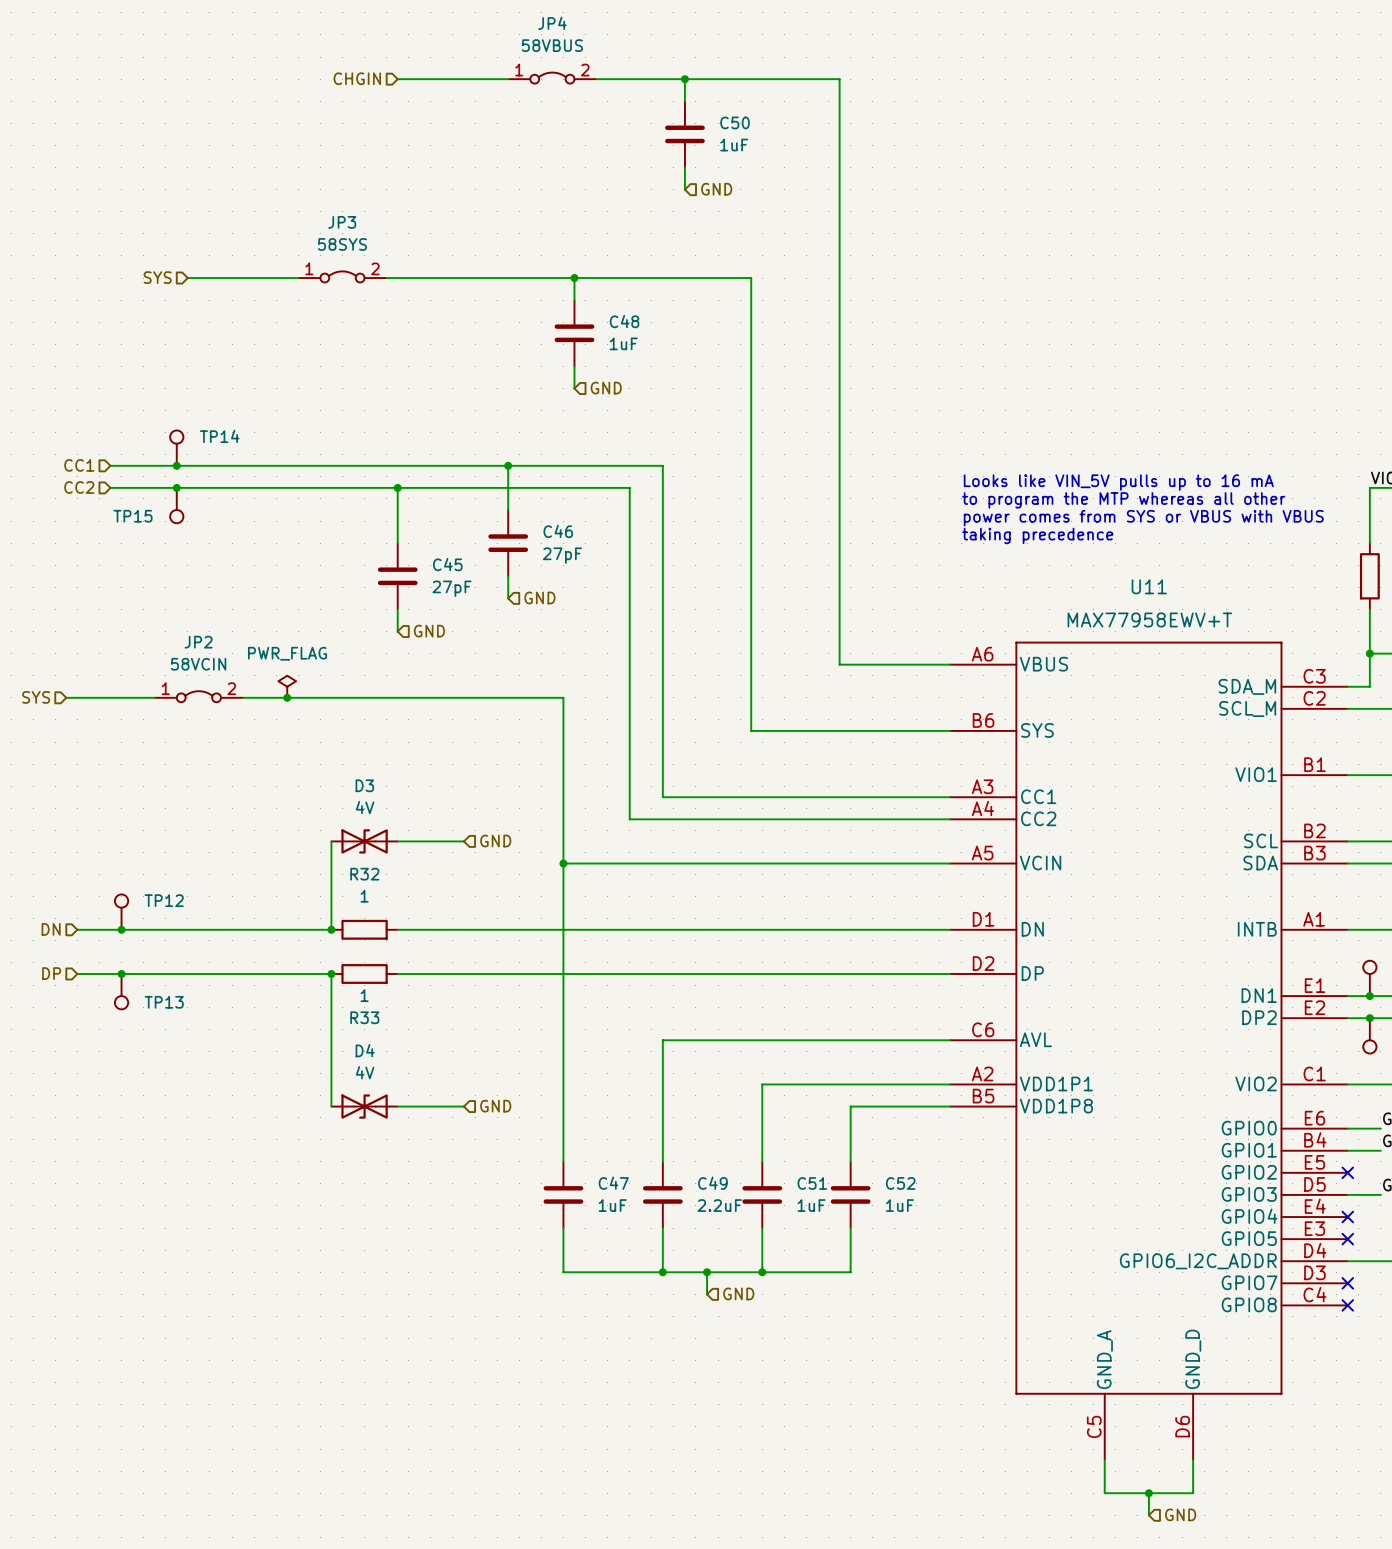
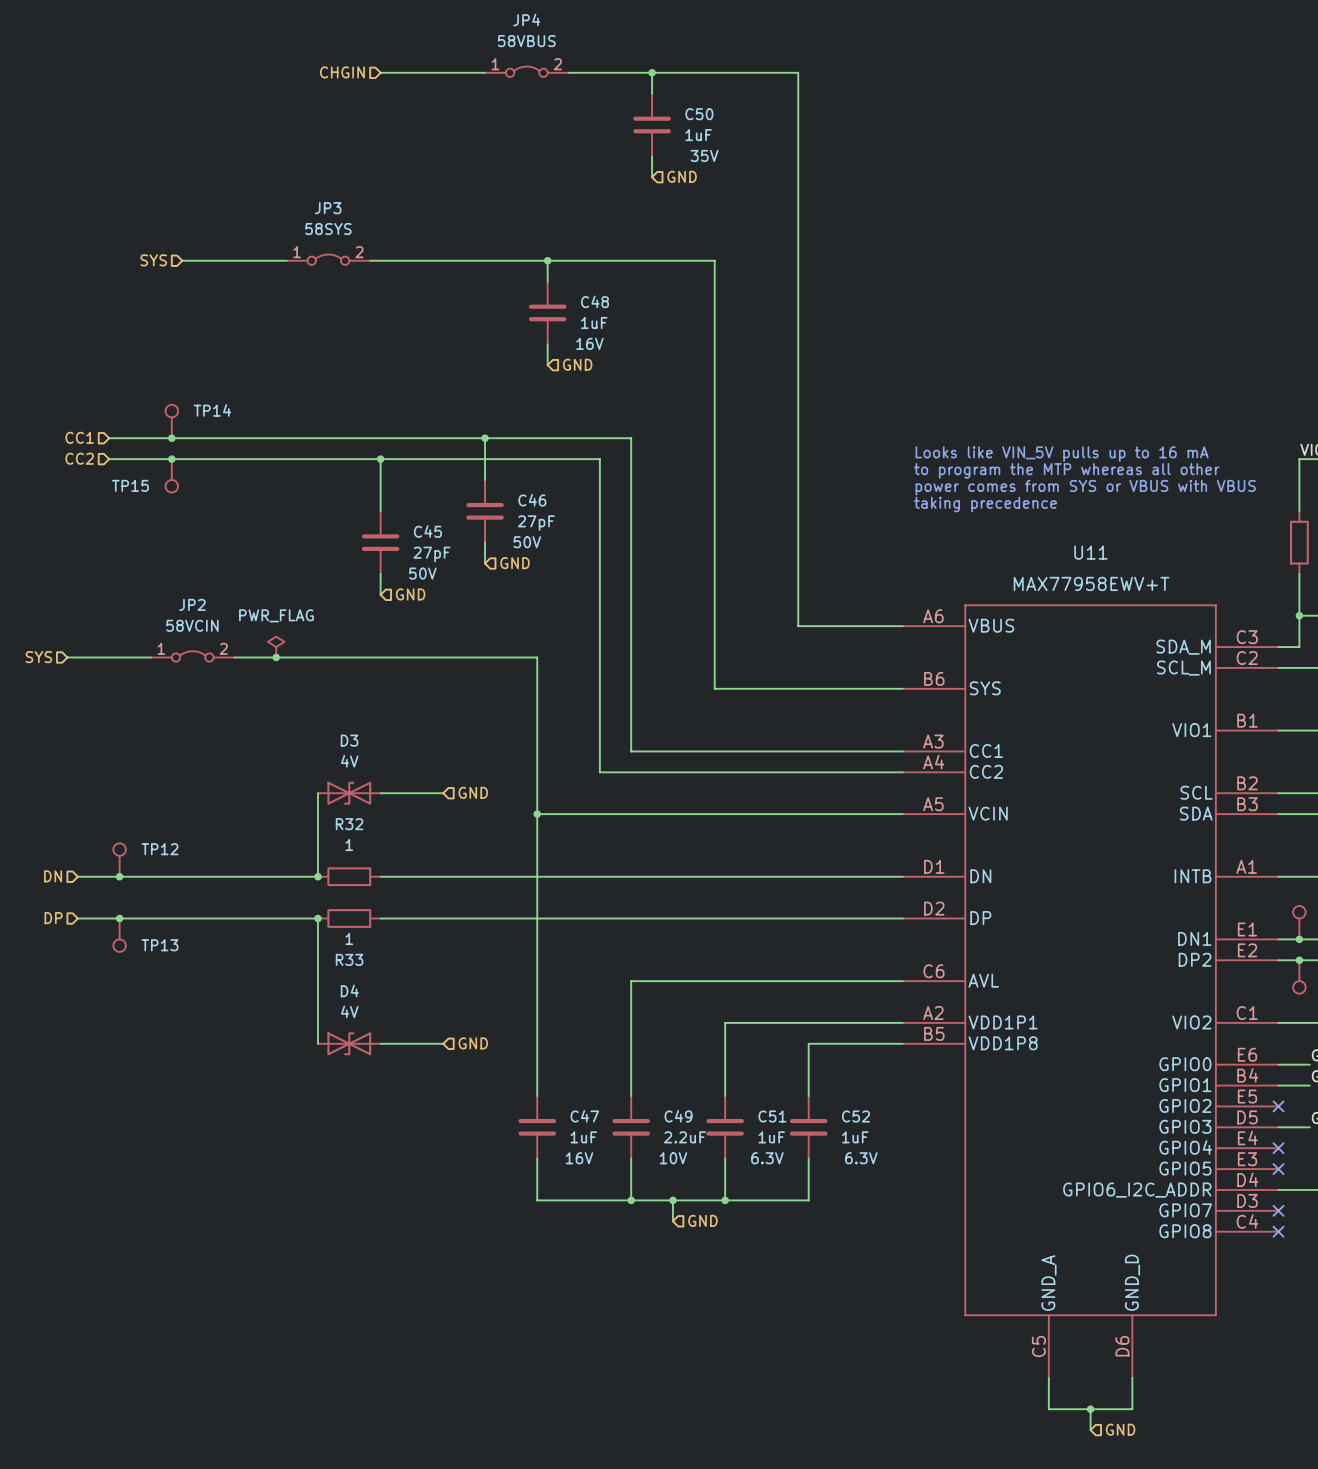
C50 text: none -> 35V (704, 155)
C48 text: none -> 16V (589, 343)
C46 text: none -> 50V (527, 542)
C45 text: none -> 50V (422, 573)
C47 text: none -> 16V (579, 1158)
C49 text: none -> 10V (673, 1158)
C51 text: none -> 6.3V (767, 1158)
C52 text: none -> 6.3V (861, 1158)

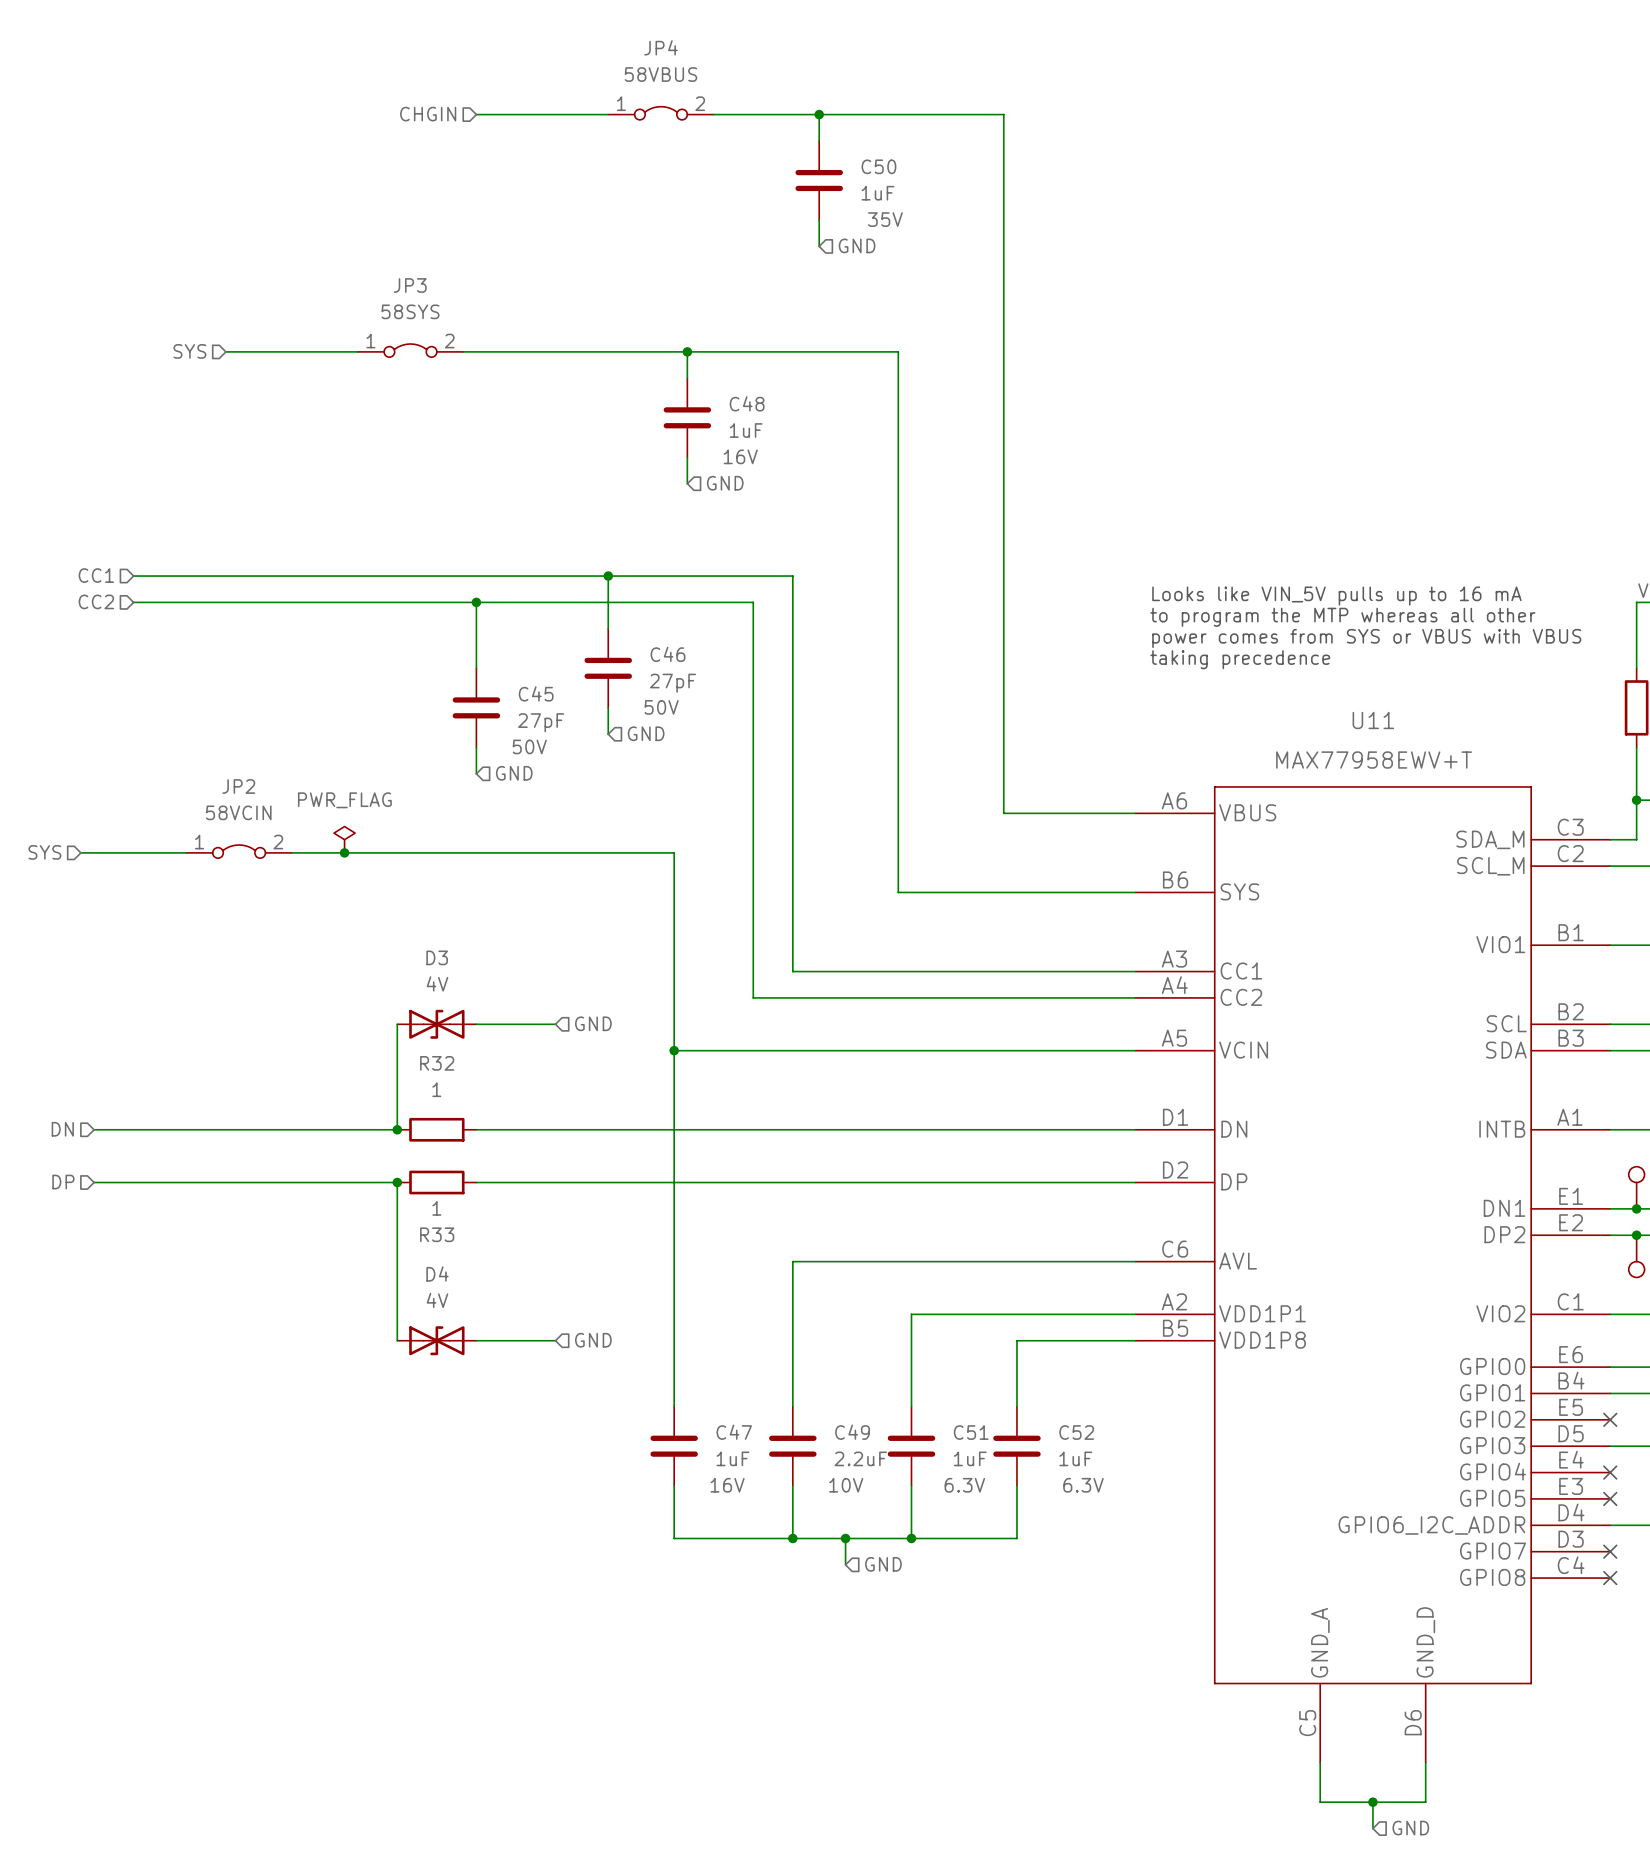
TP14: (171, 421) -> none
junction: (171, 438) -> none
junction: (171, 459) -> none
TP15: (171, 475) -> none
TP12: (119, 860) -> none
junction: (119, 876) -> none
junction: (119, 918) -> none
TP13: (119, 935) -> none

